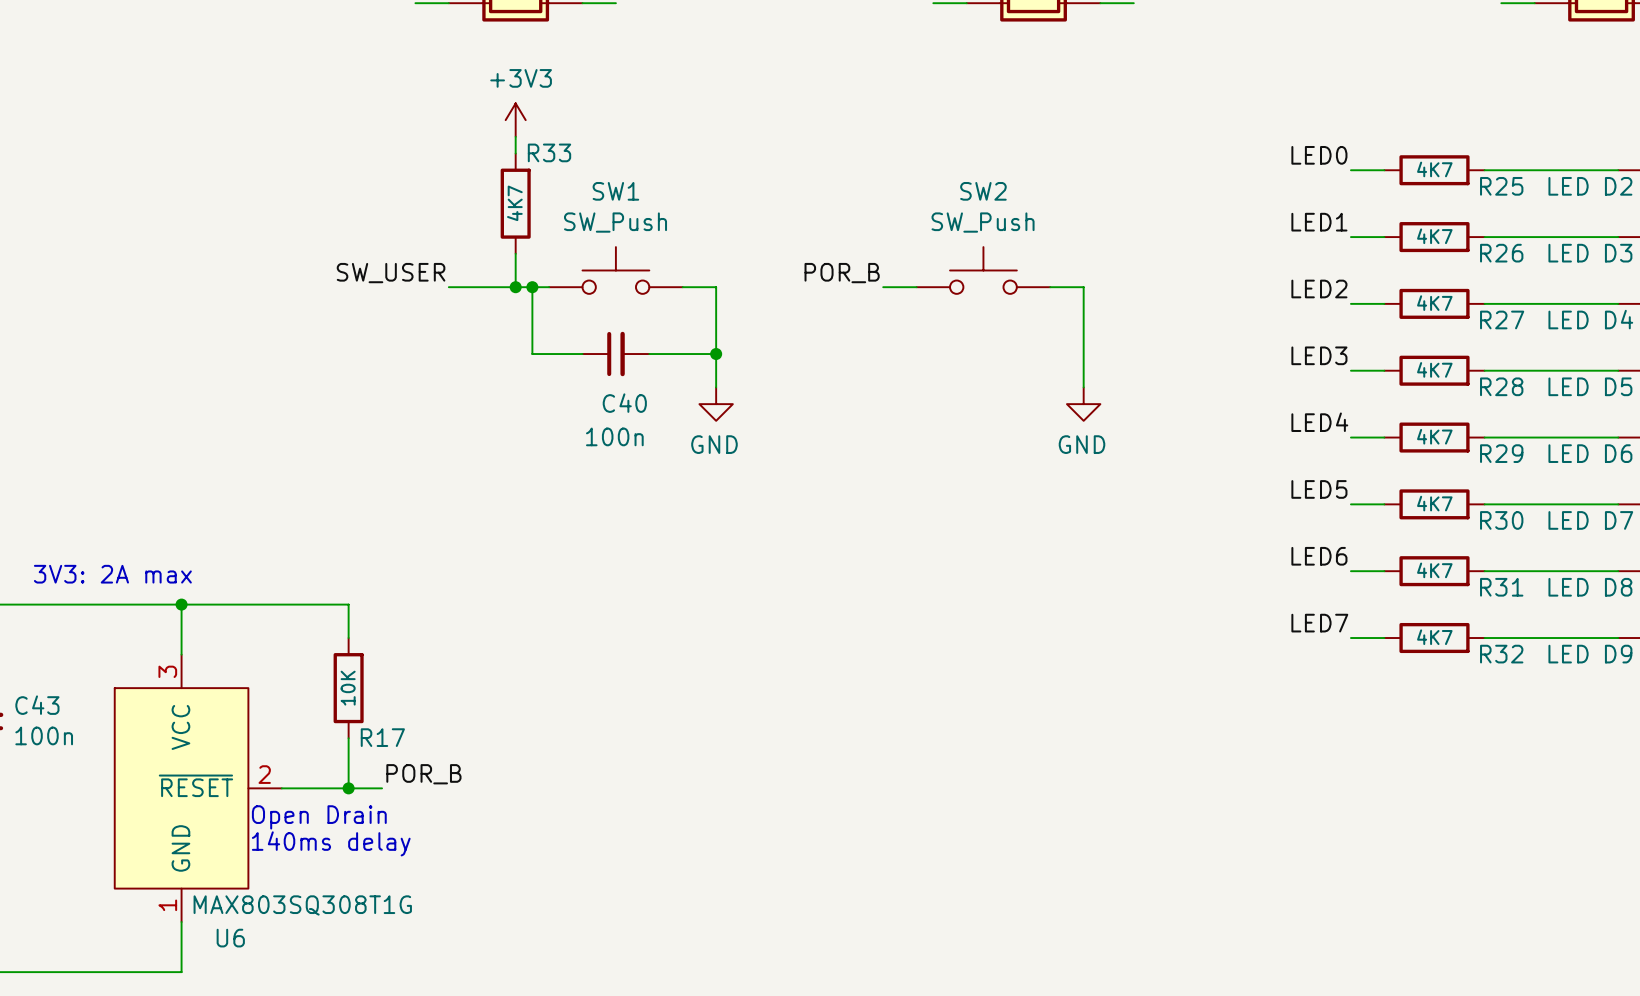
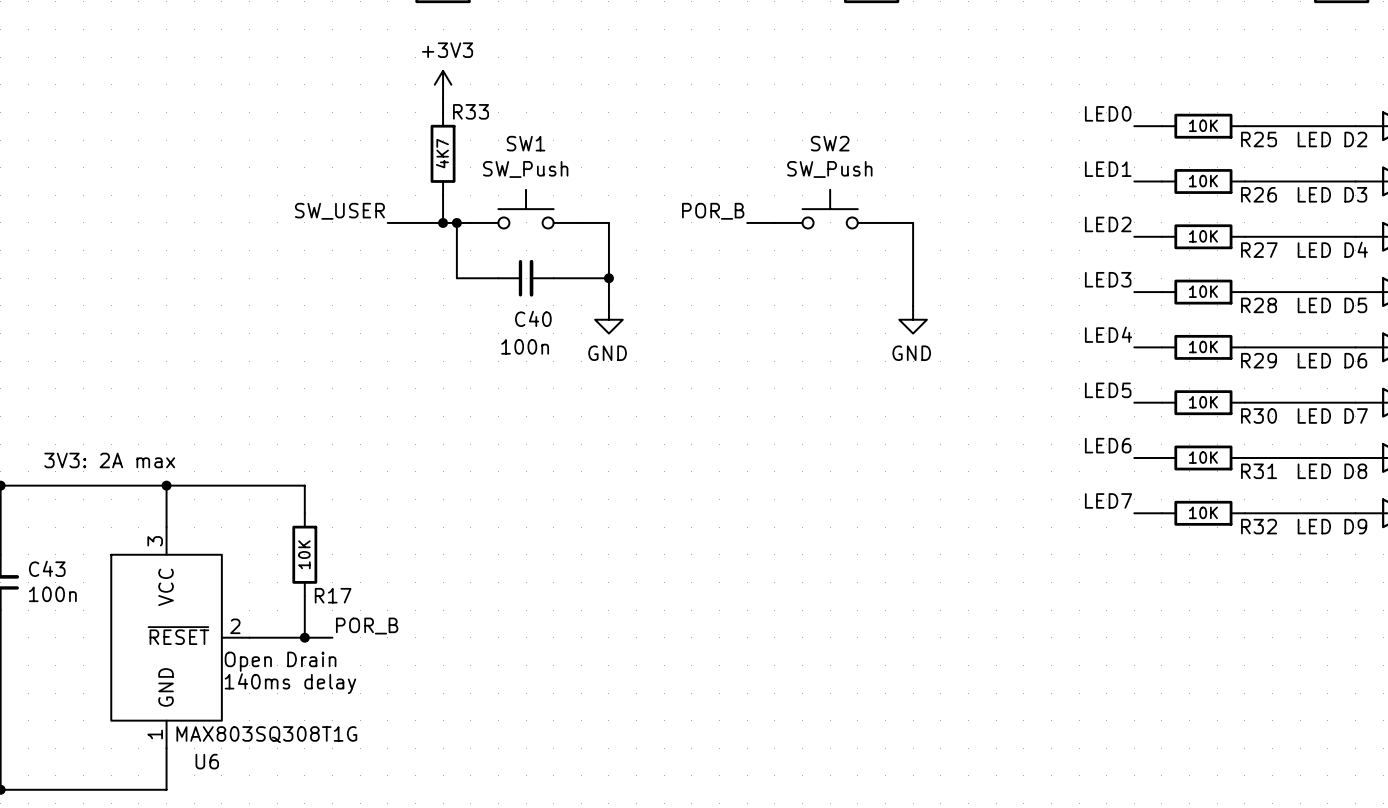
R25 value: 4K7 (1434, 169) -> 10K (1203, 125)
R26 value: 4K7 (1434, 236) -> 10K (1203, 181)
R27 value: 4K7 (1434, 303) -> 10K (1203, 236)
R28 value: 4K7 (1434, 369) -> 10K (1203, 291)
R29 value: 4K7 (1434, 436) -> 10K (1203, 346)
R30 value: 4K7 (1434, 503) -> 10K (1203, 402)
R31 value: 4K7 (1434, 570) -> 10K (1203, 457)
R32 value: 4K7 (1434, 637) -> 10K (1203, 512)

